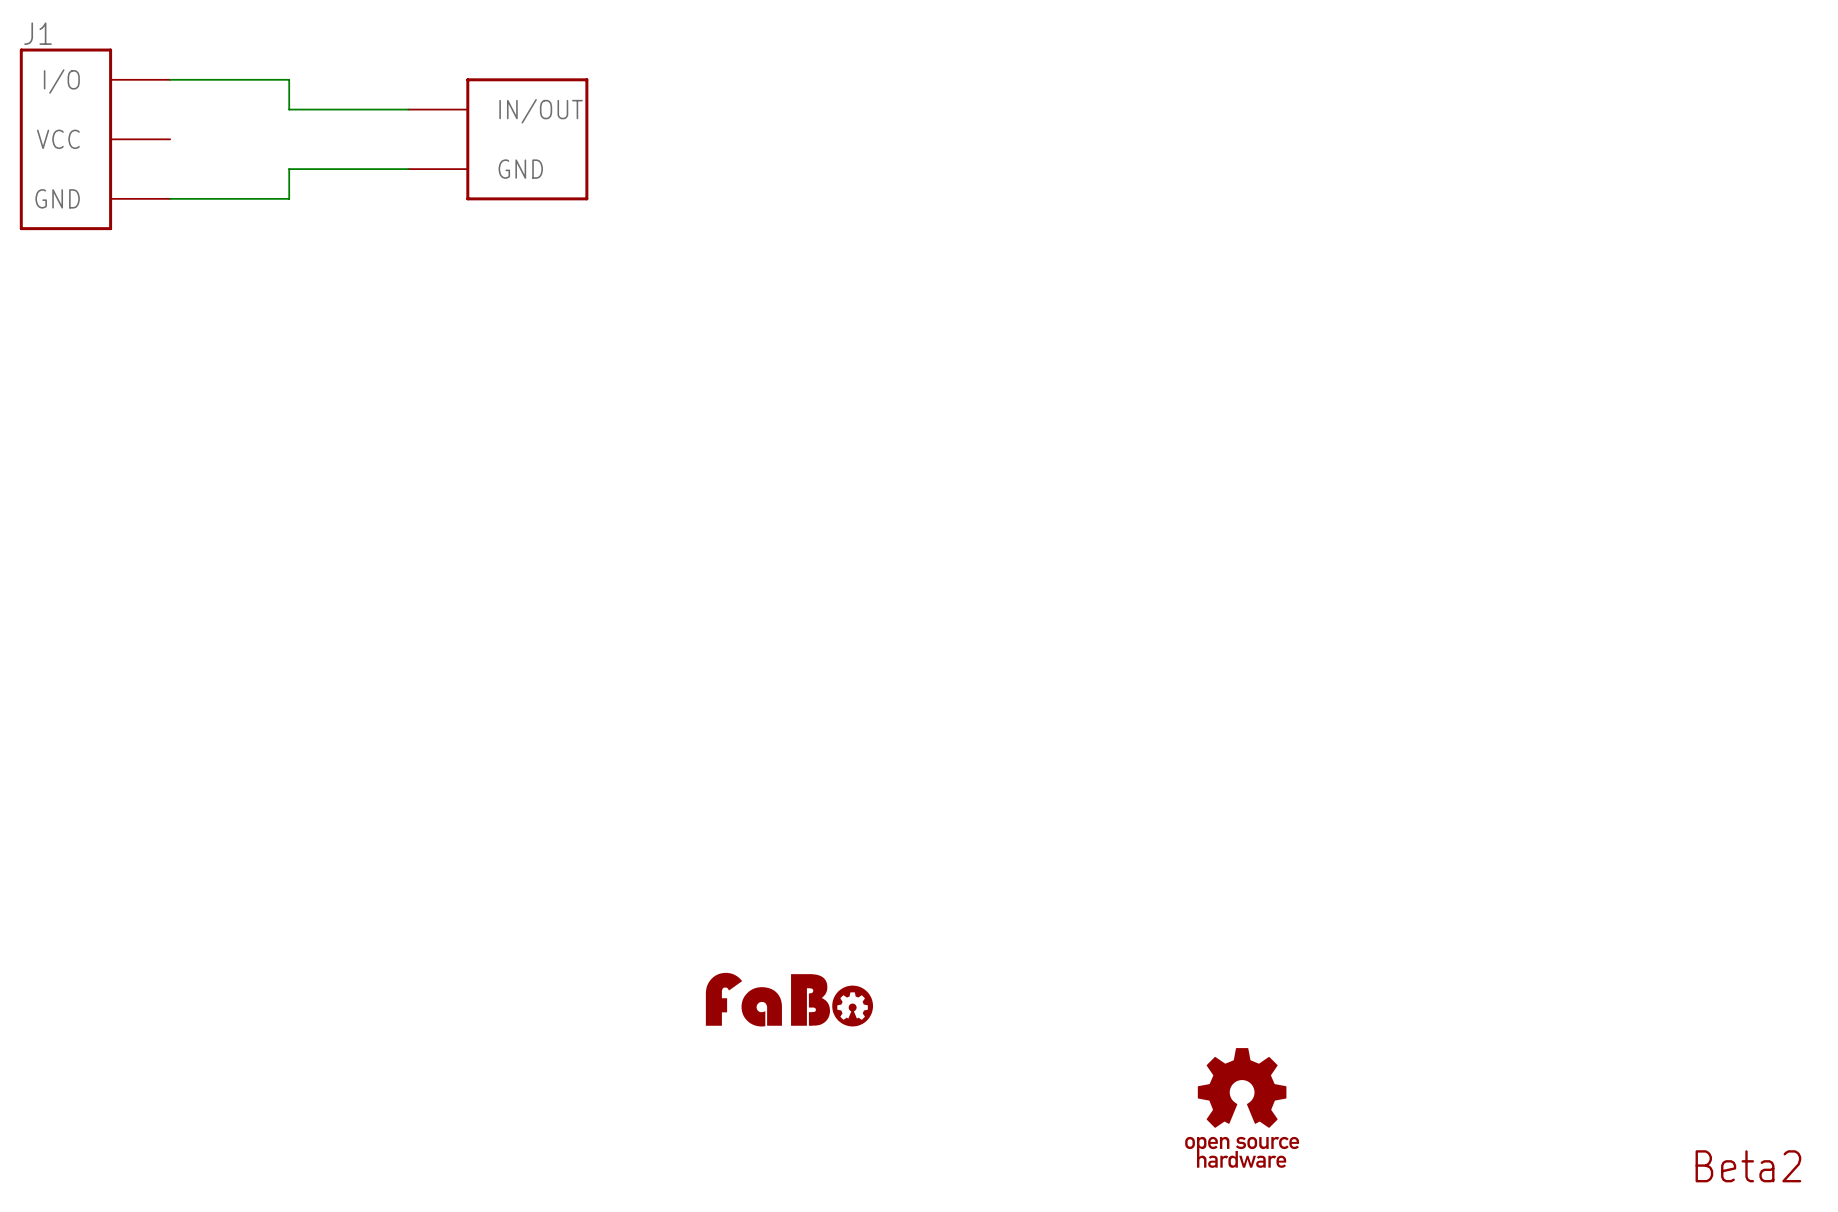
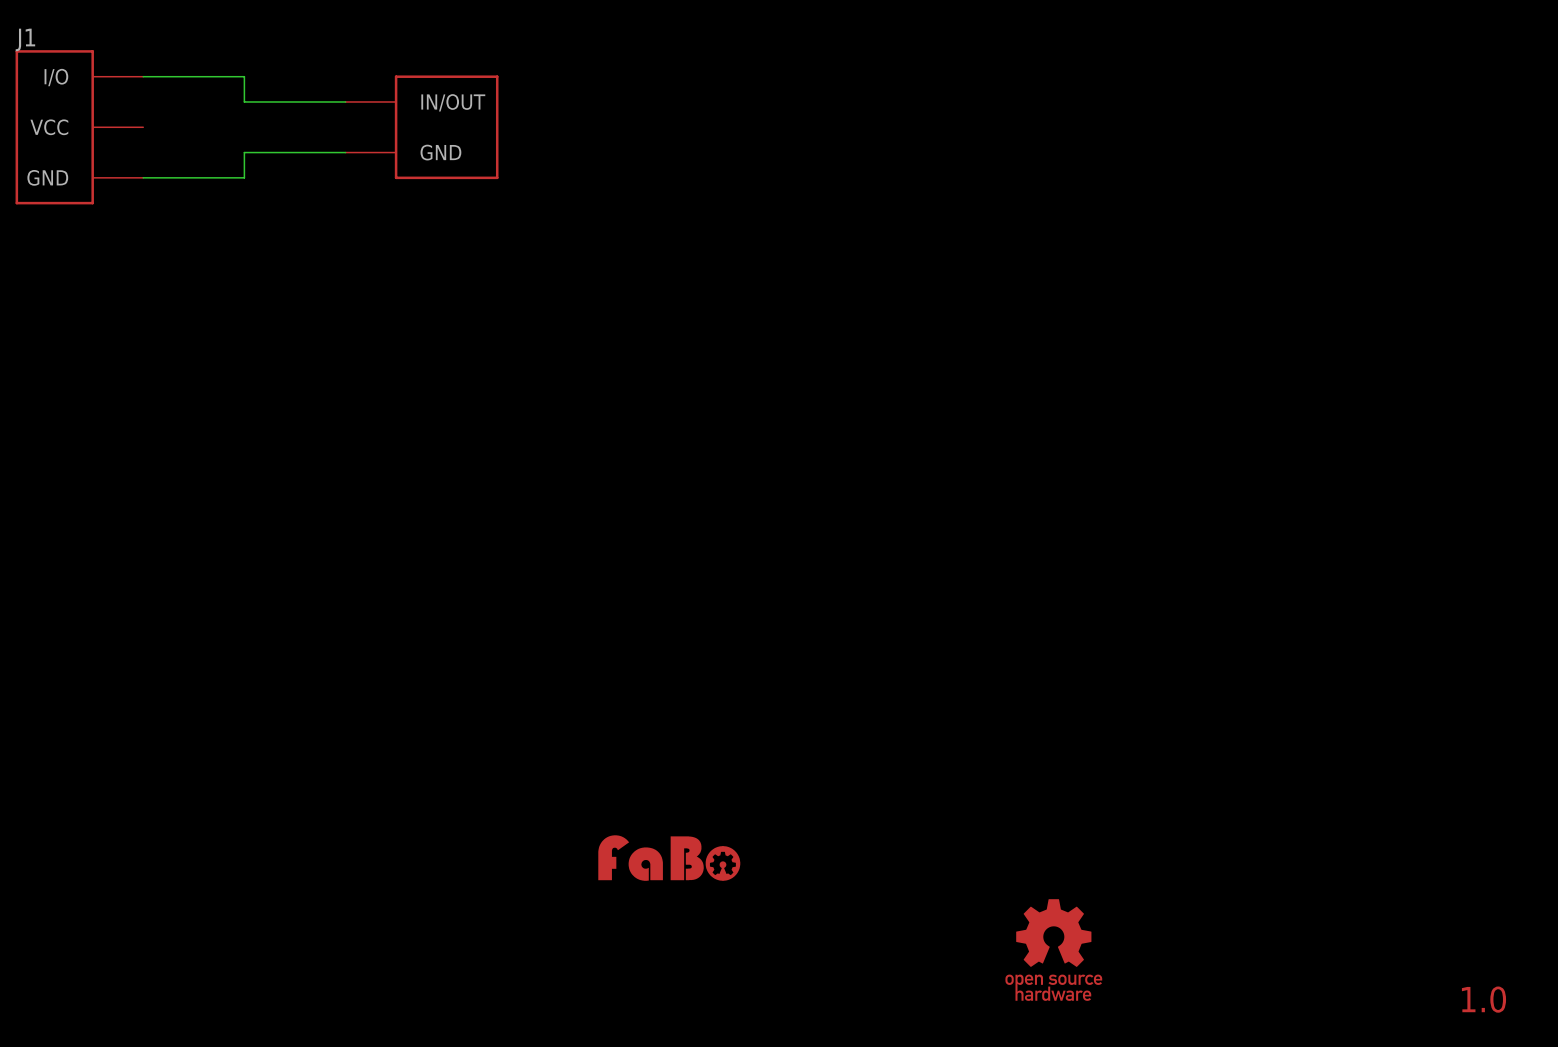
text: Beta2 (1748, 1166) -> 1.0 (1483, 999)

